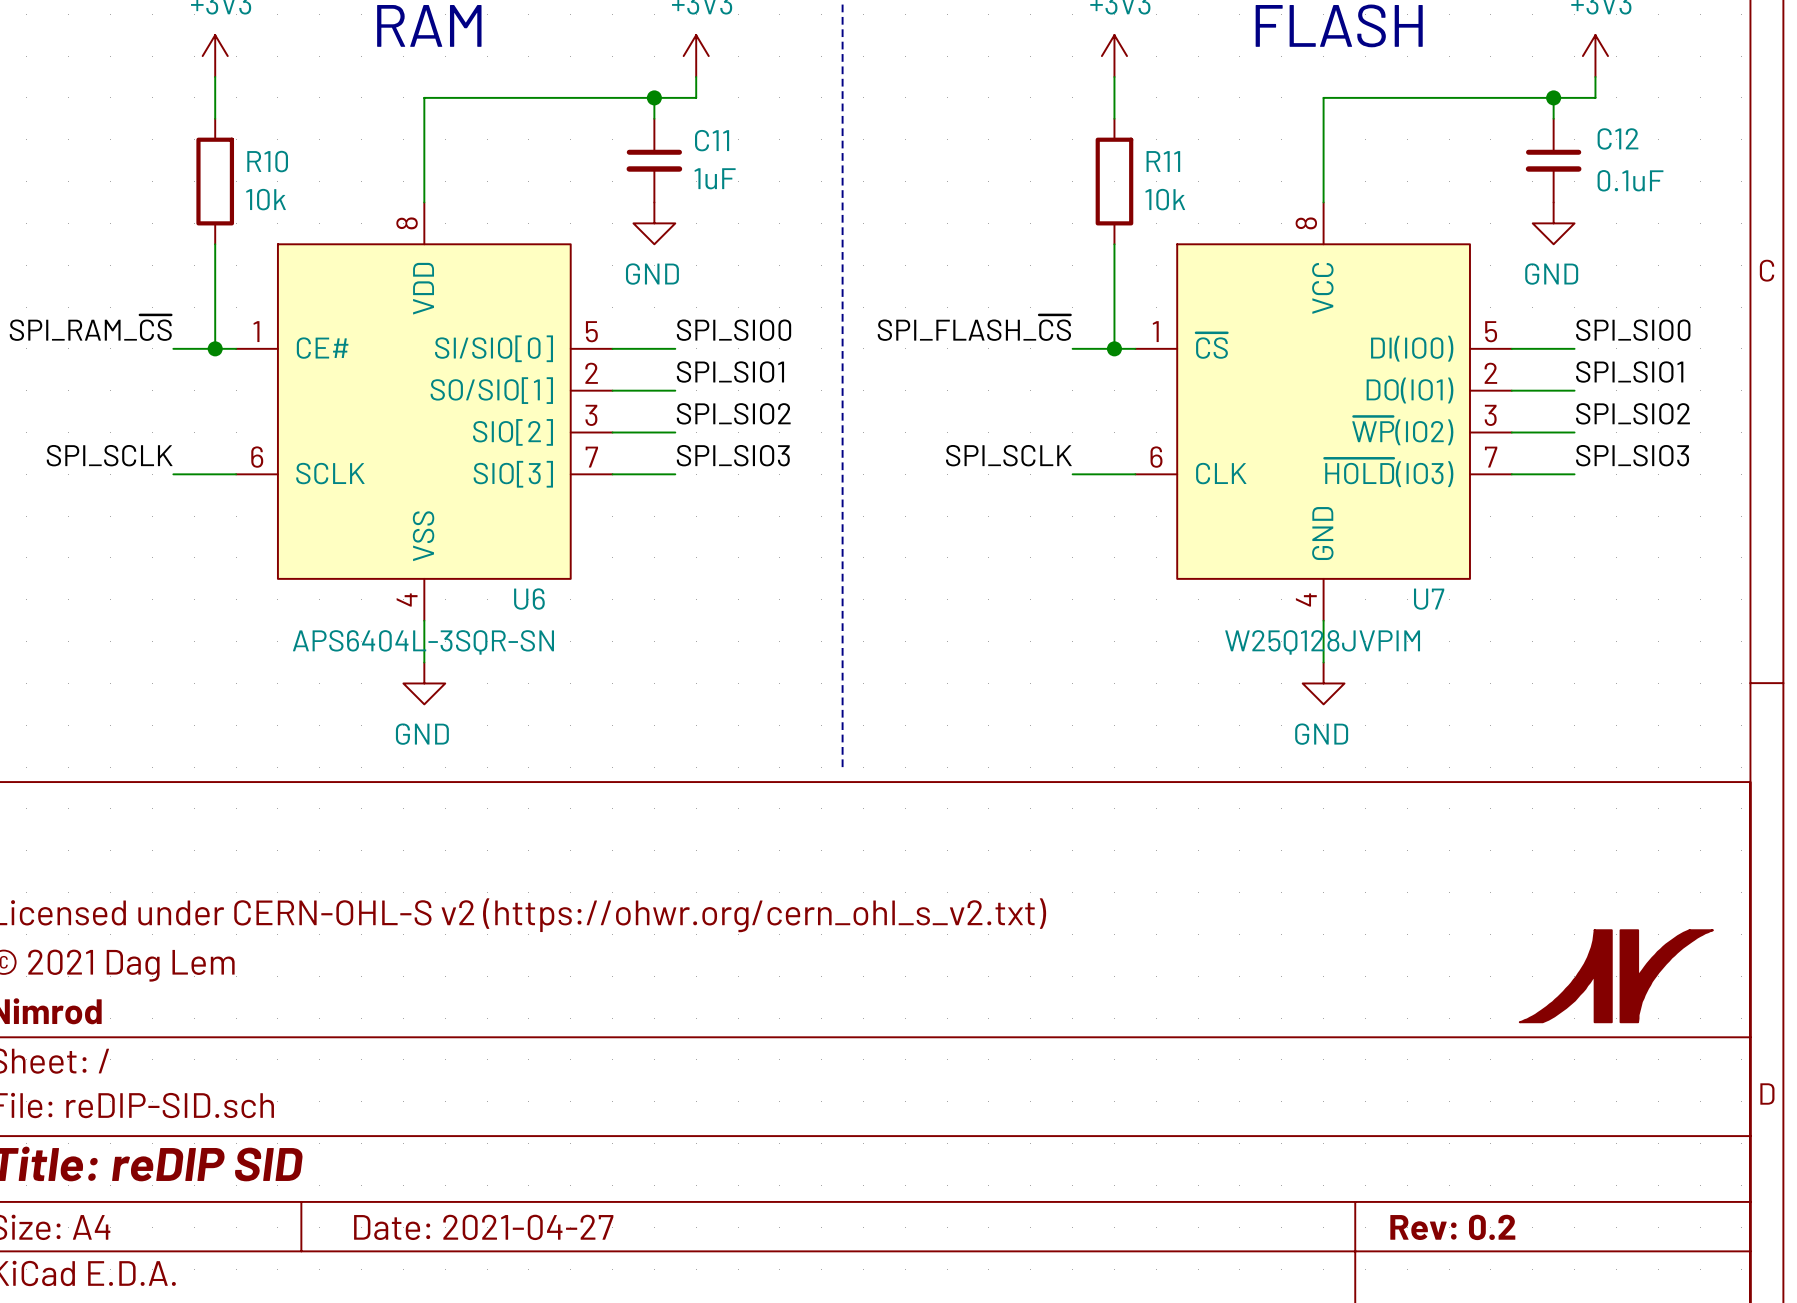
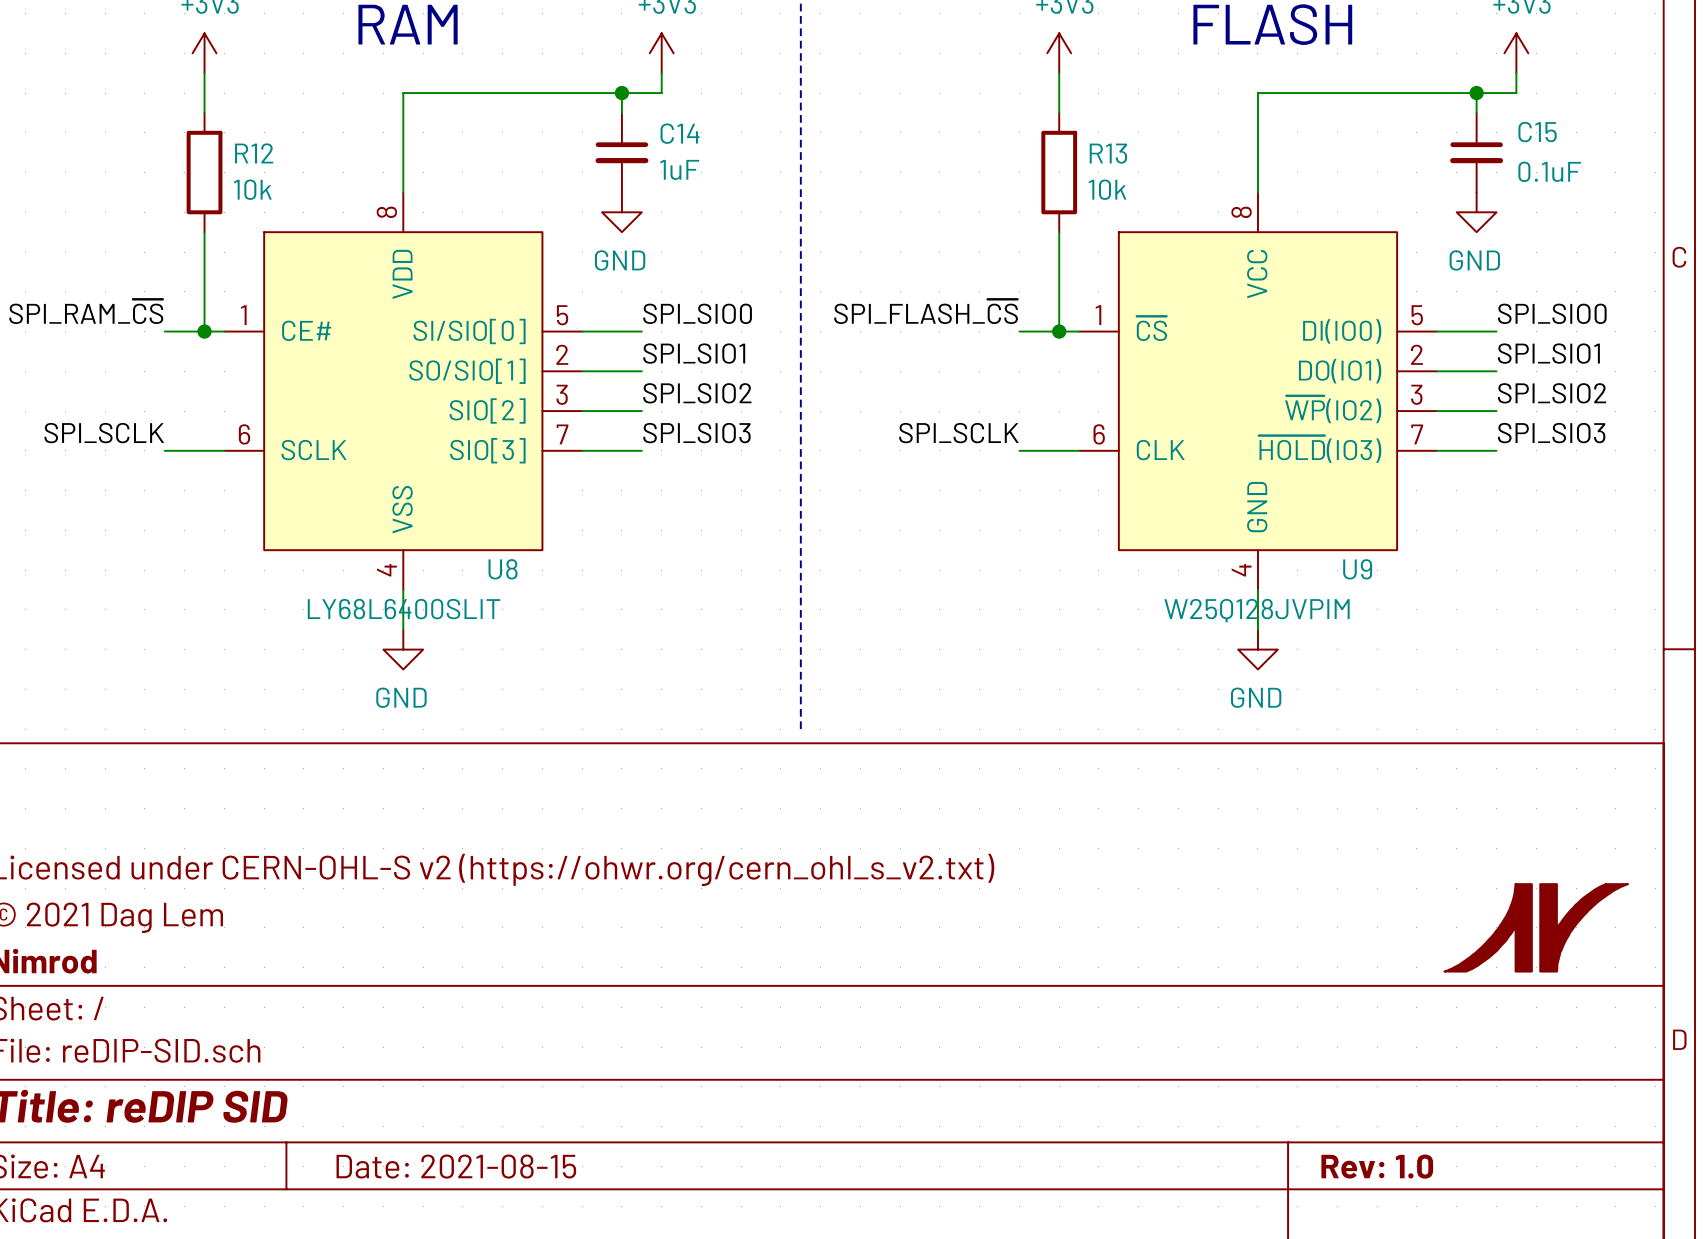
C12 name: C12 (1617, 138) -> C15 (1537, 132)
C11 name: C11 (712, 140) -> C14 (680, 133)
R10 name: R10 (267, 161) -> R12 (254, 153)
R11 name: R11 (1163, 161) -> R13 (1108, 153)
U6 name: U6 (529, 599) -> U8 (503, 569)
U7 name: U7 (1429, 599) -> U9 (1357, 569)
U6 value: APS6404L-3SQR-SN (423, 642) -> LY68L6400SLIT (404, 609)
title block: Date: 2021-04-27 (483, 1227) -> Date: 2021-08-15 (456, 1166)
title block: Rev: 0.2 (1452, 1227) -> Rev: 1.0 (1377, 1166)

